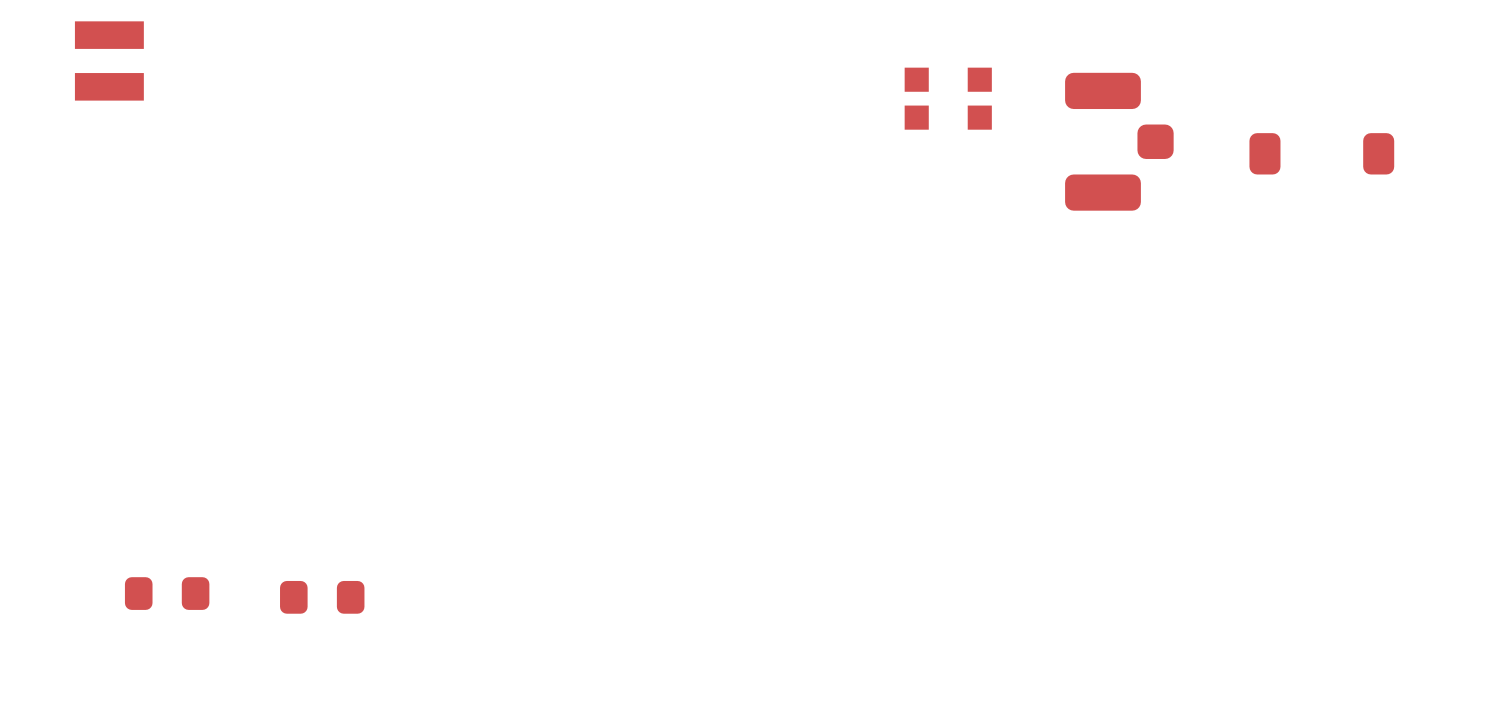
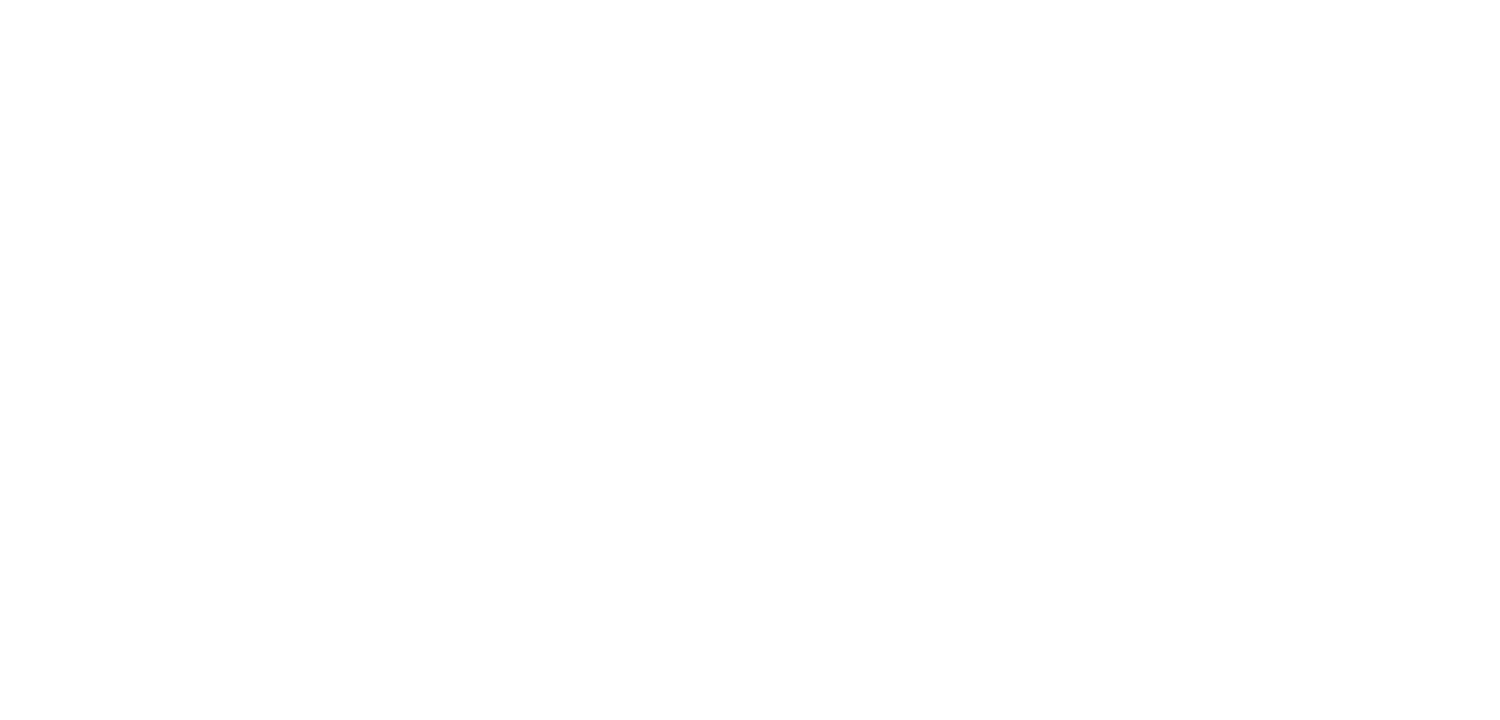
part: (109, 60) -> none
part: (948, 98) -> none
part: (1119, 141) -> none
part: (1321, 153) -> none
part: (167, 593) -> none
part: (322, 597) -> none

